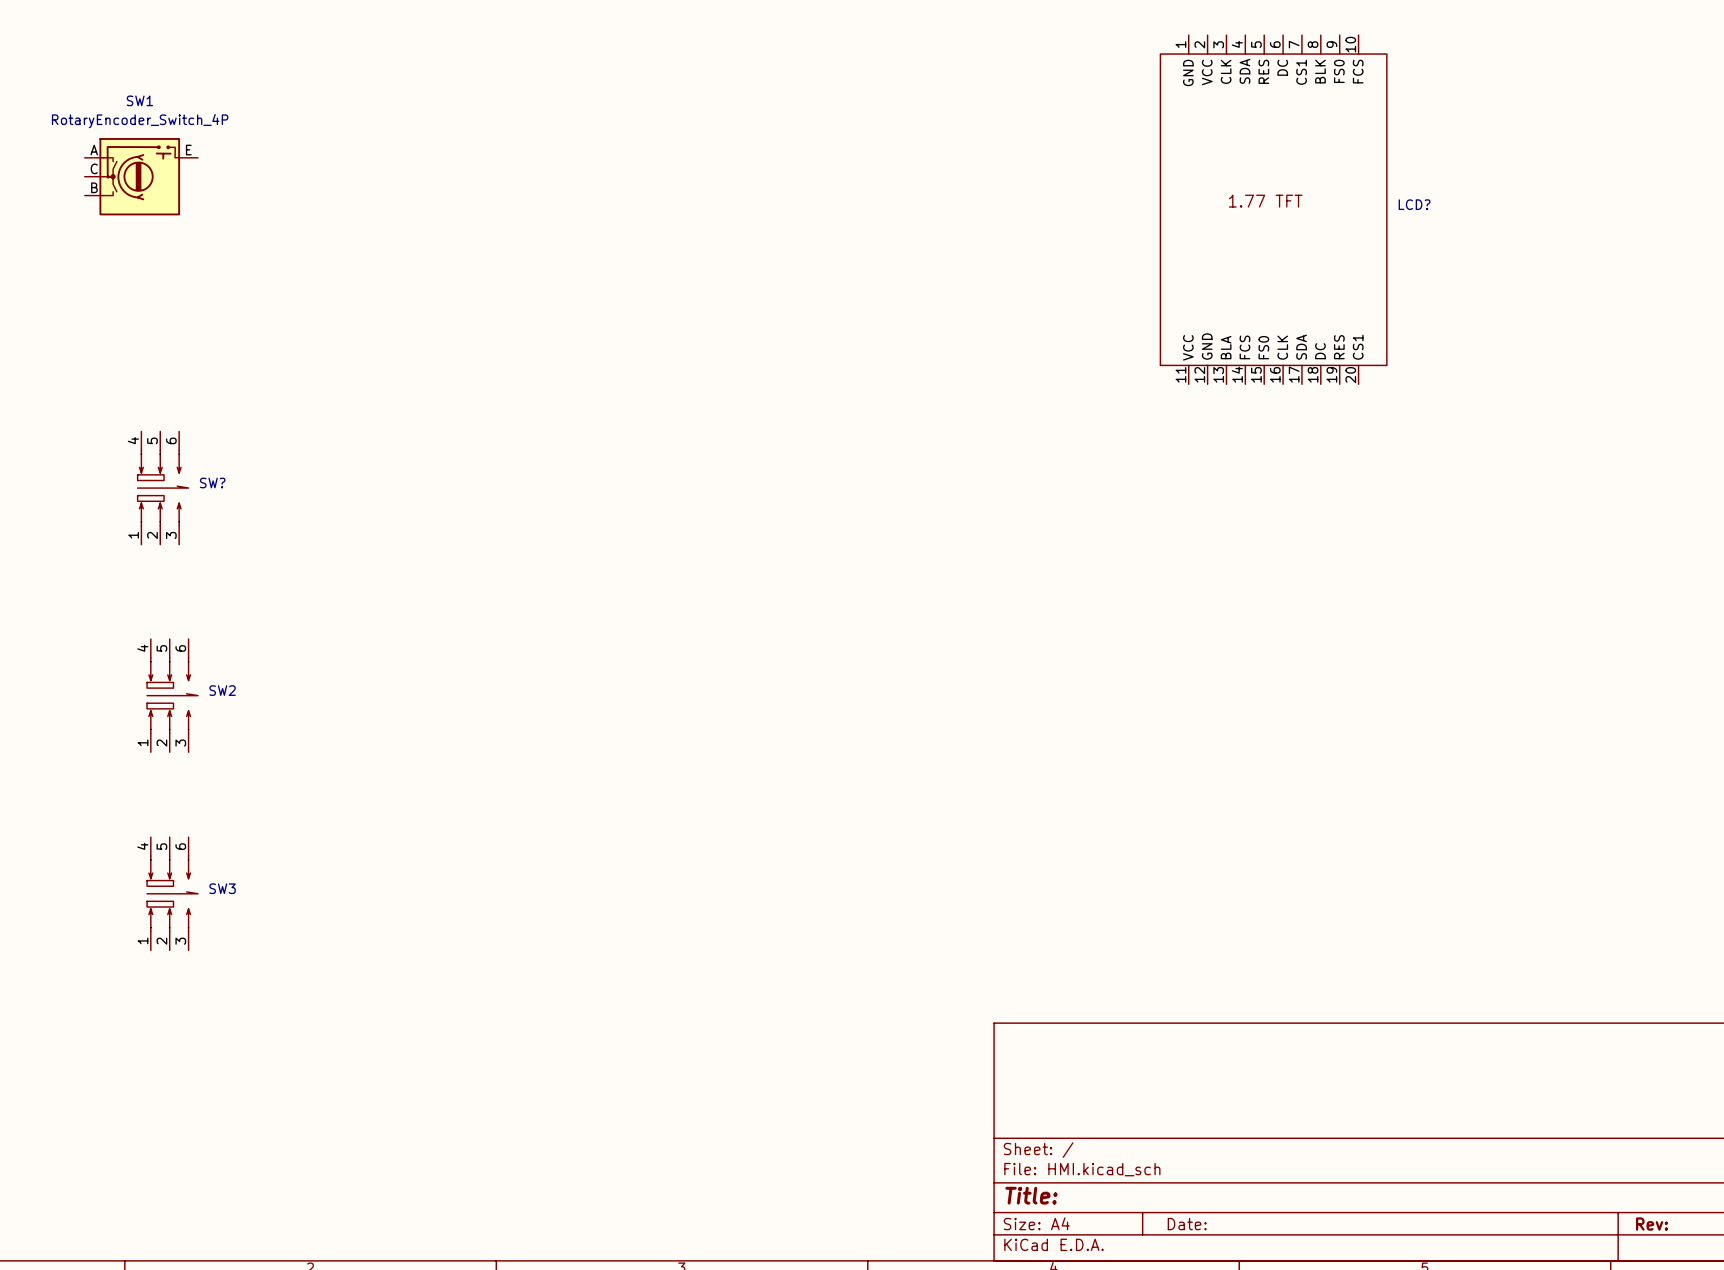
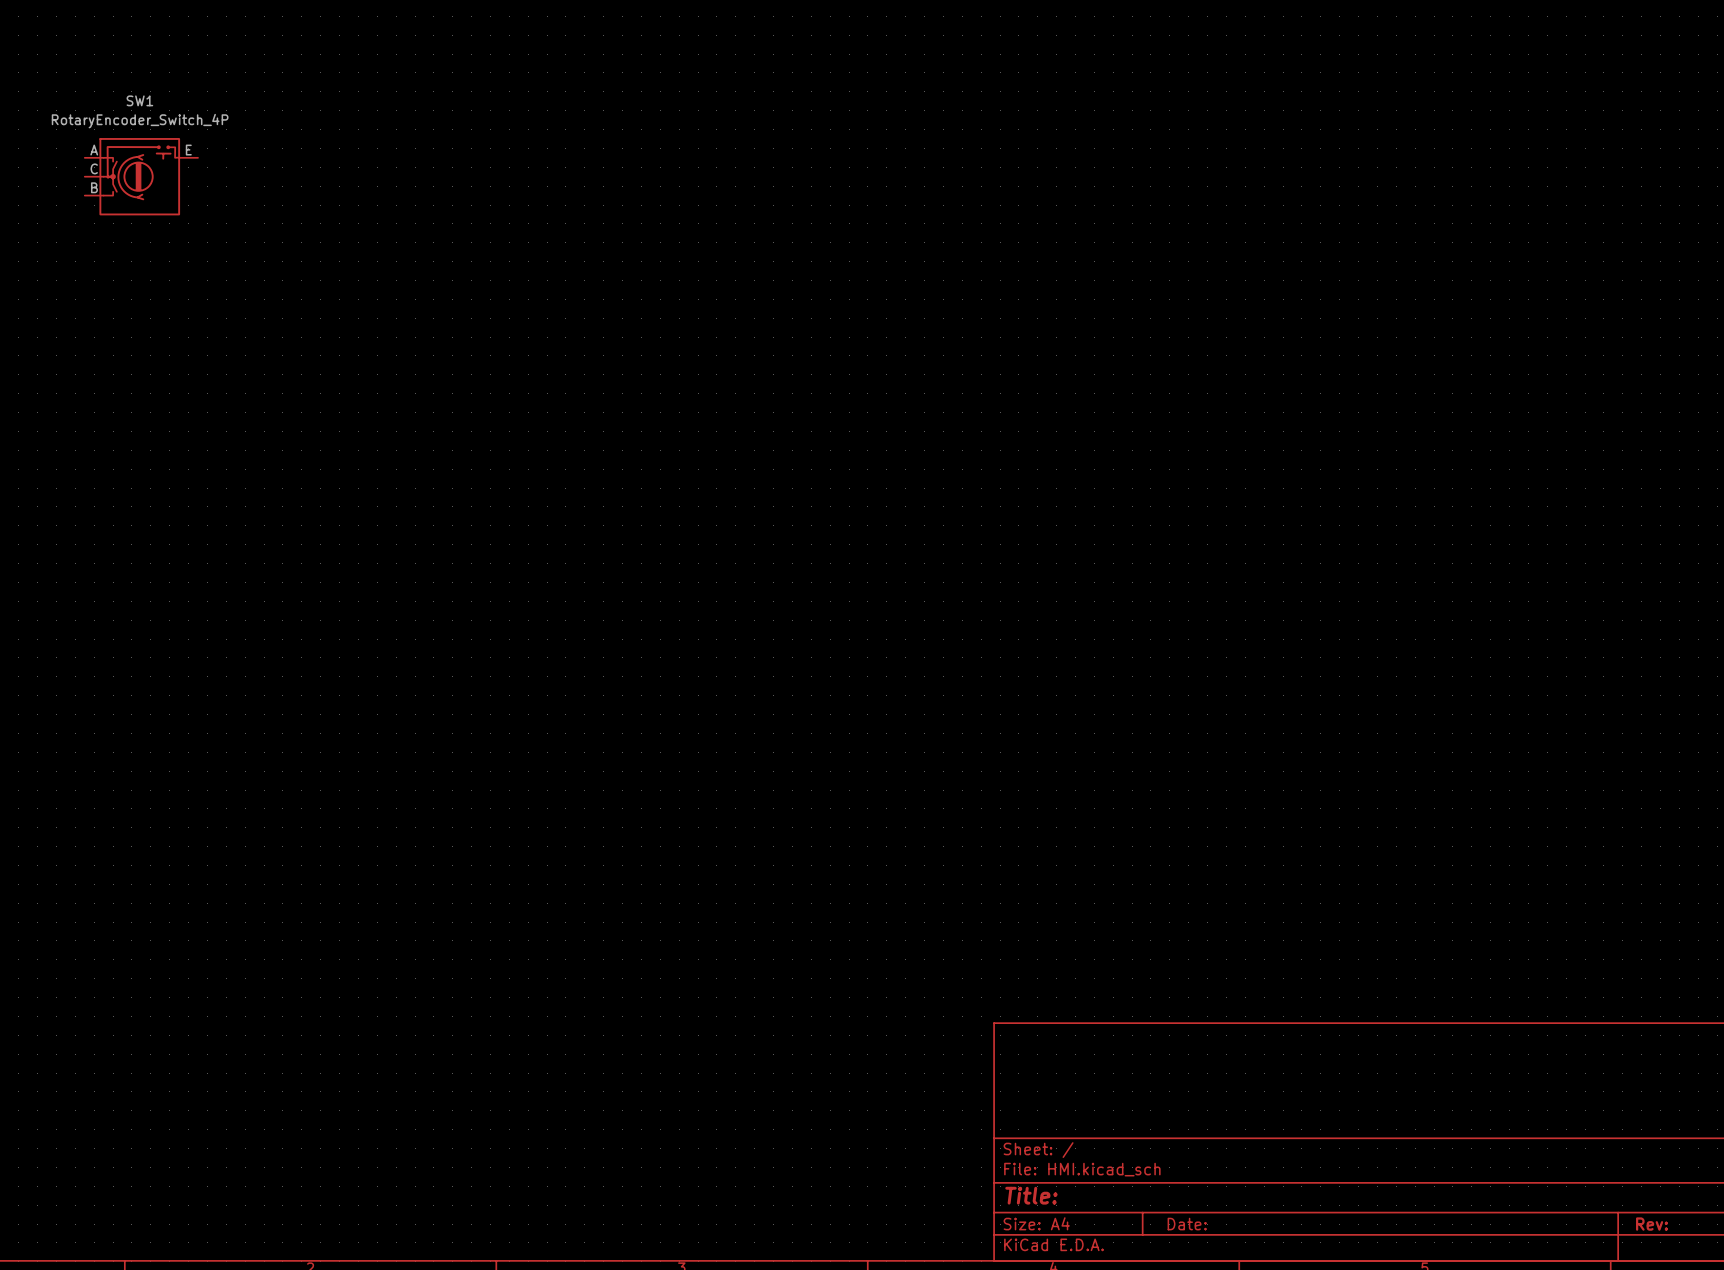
LCD?: (1273, 209) -> none
SW?: (163, 488) -> none
SW2: (172, 695) -> none
SW3: (172, 893) -> none

